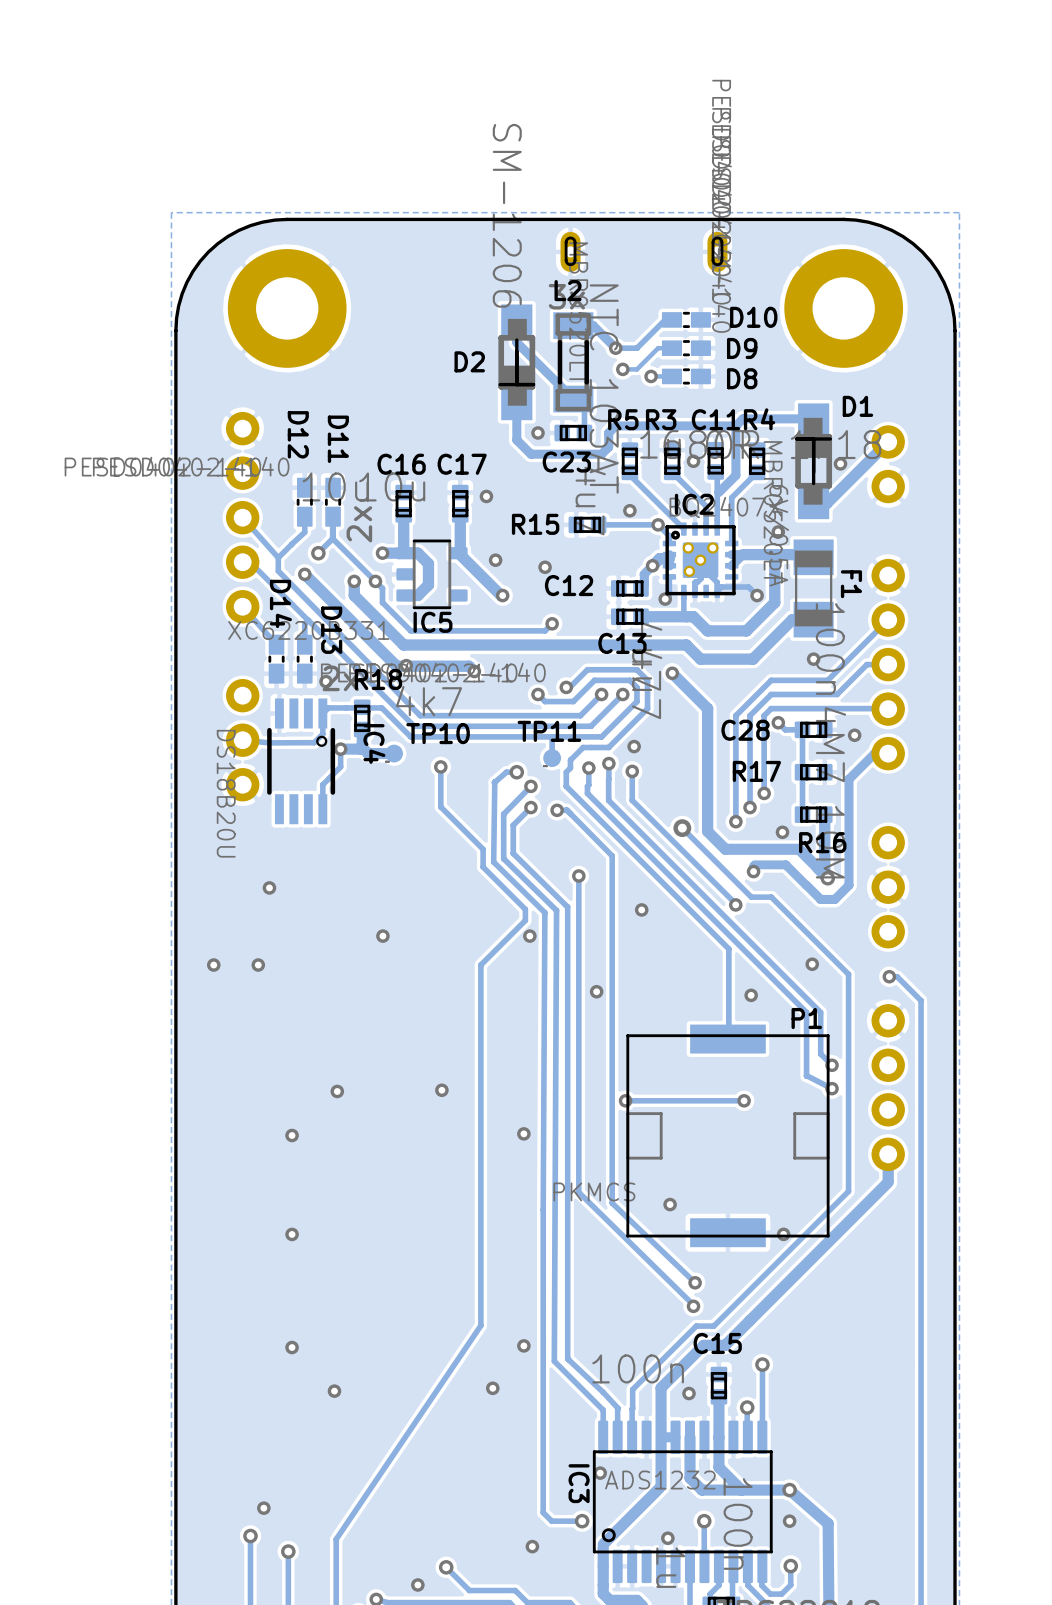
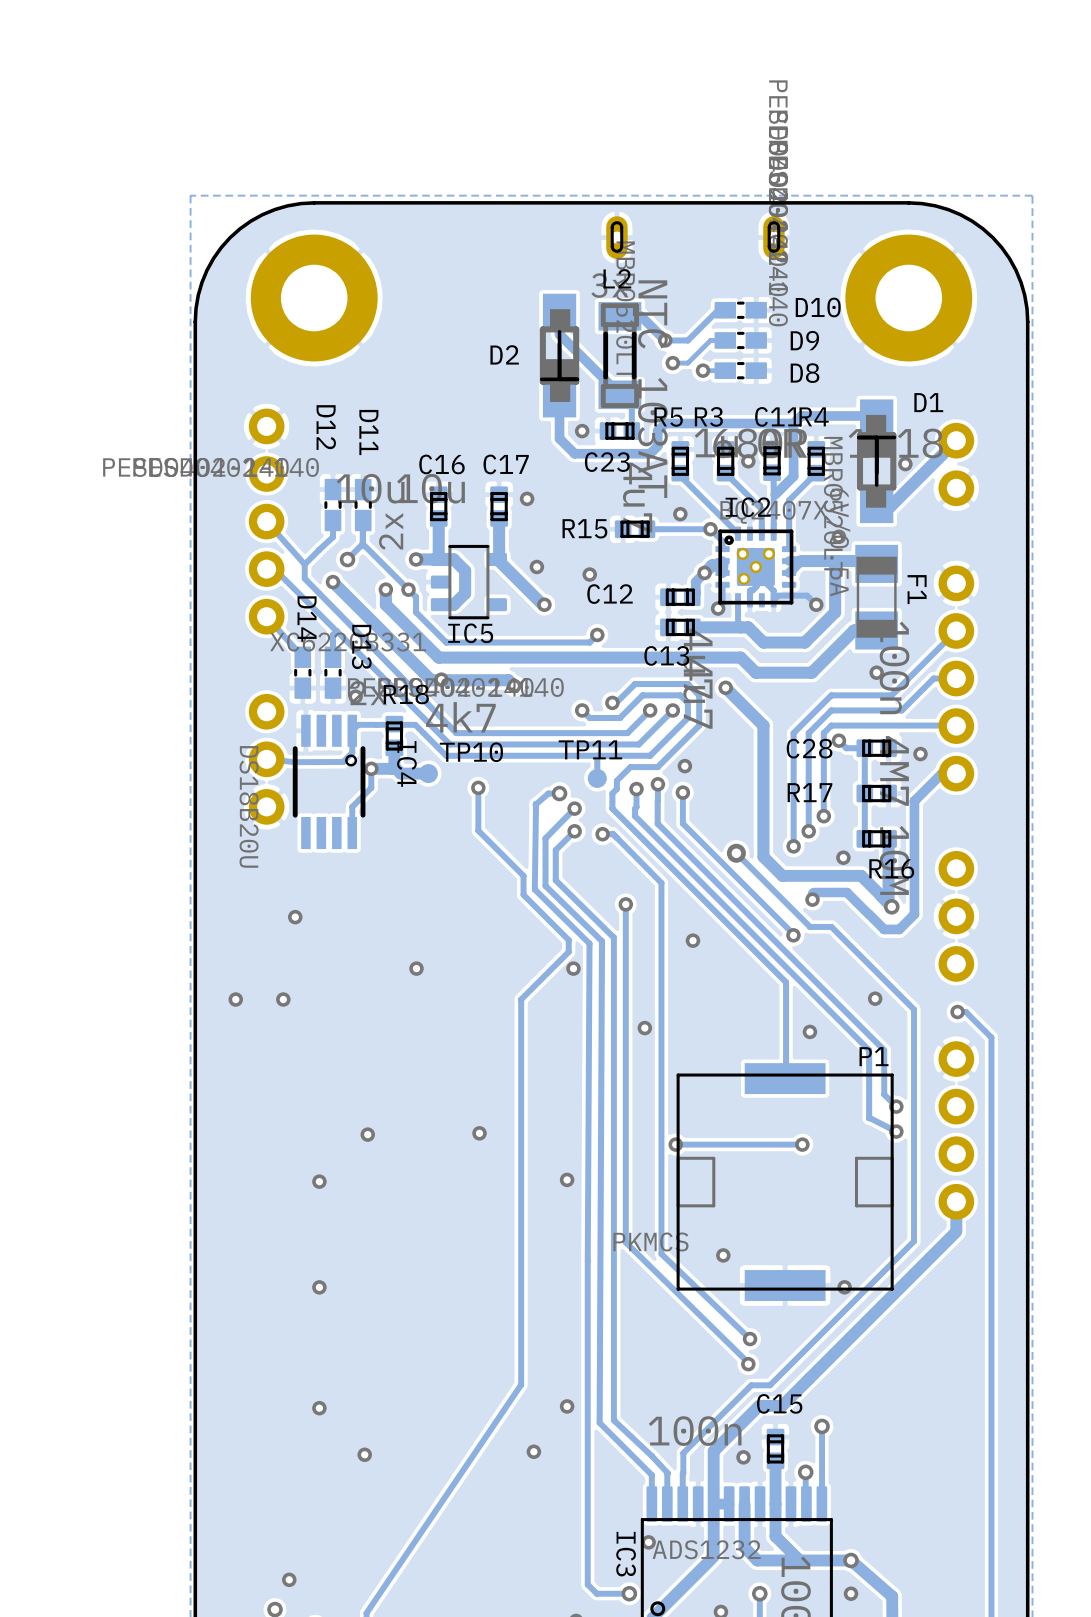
L2 value: SM-1206 (507, 215) -> none

